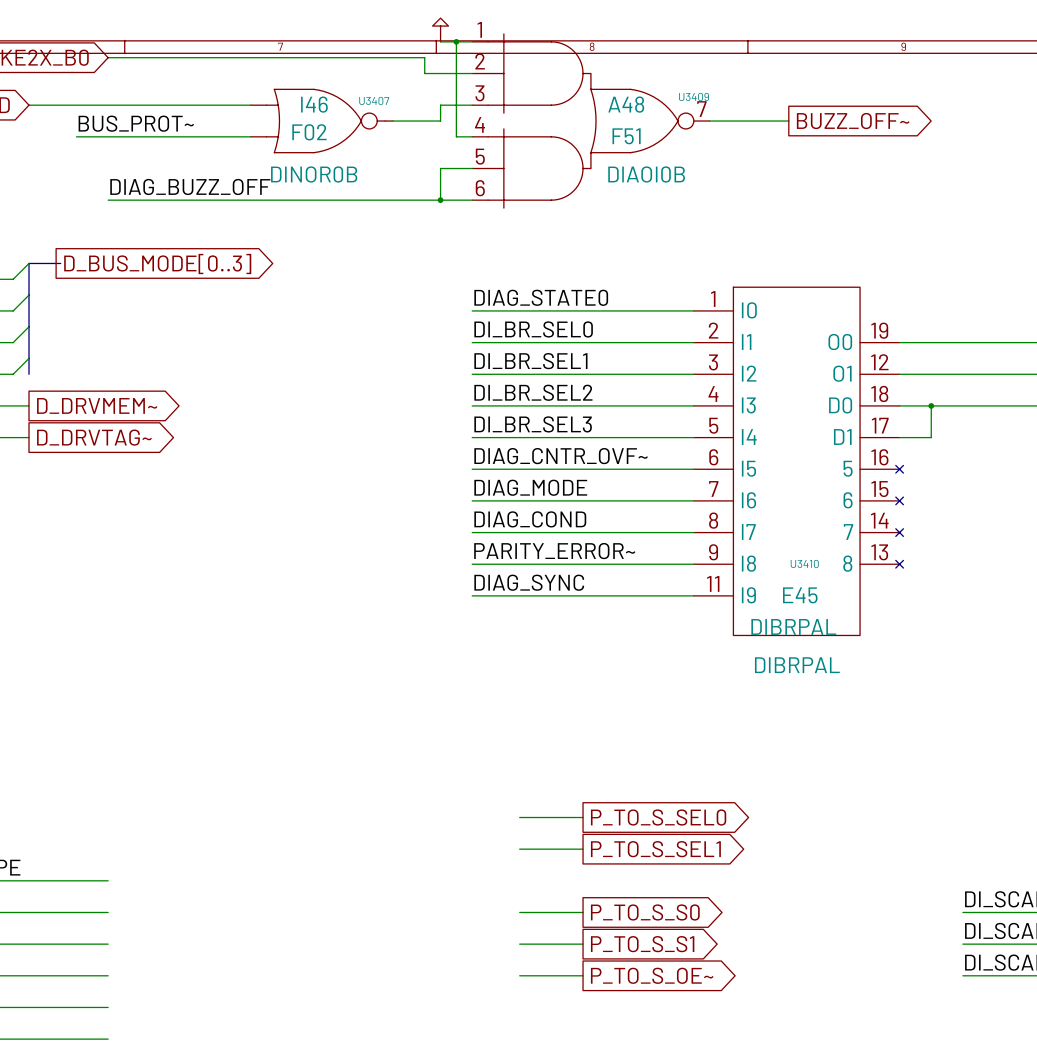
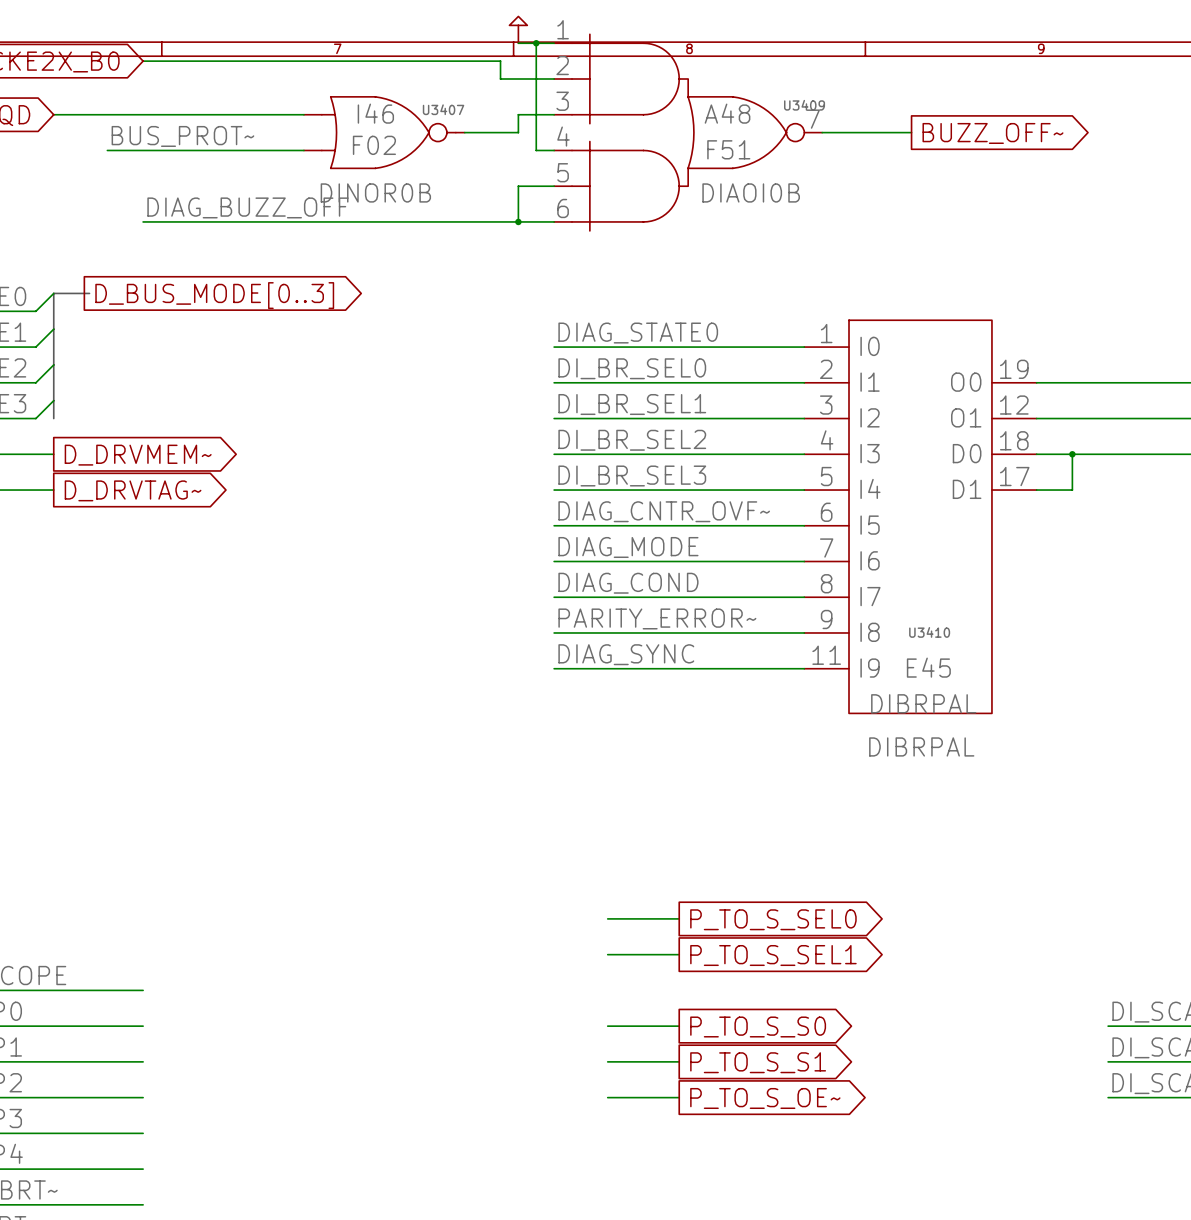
U3410 symbol: [693, 287, 900, 636] -> [804, 320, 1037, 714]
no-connect mark: (899, 469) -> none
no-connect mark: (899, 500) -> none
no-connect mark: (899, 532) -> none
no-connect mark: (899, 564) -> none

